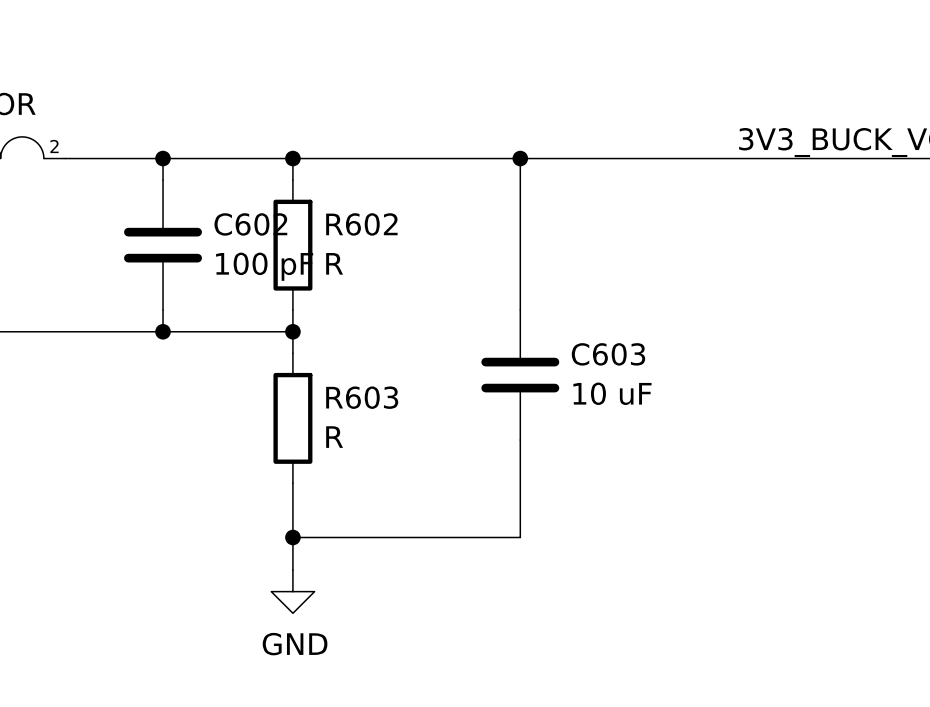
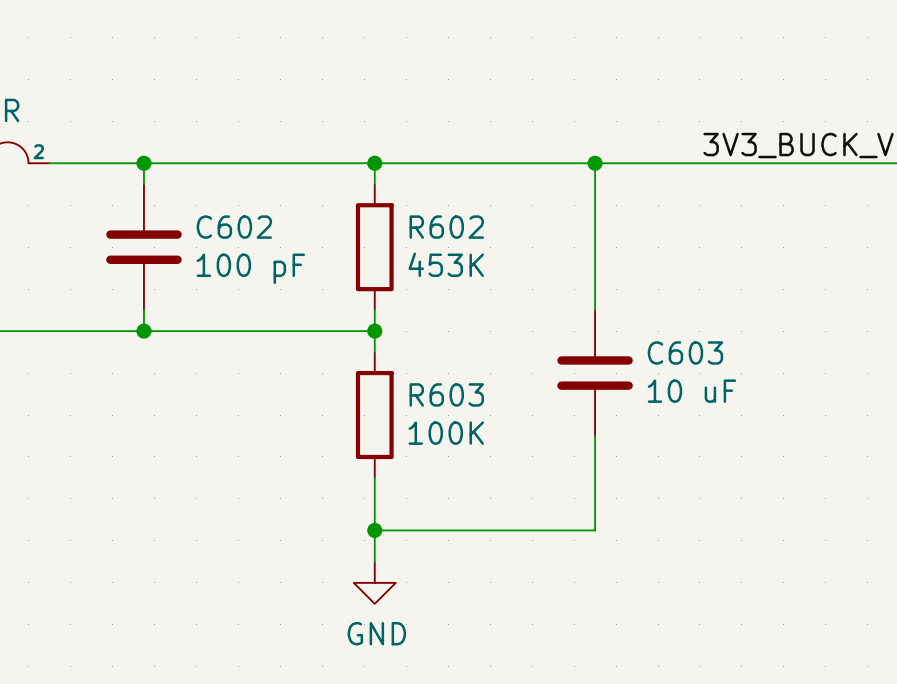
wire: (292, 158) (292, 180) -> (374, 163) (374, 184)
junction: (292, 158) -> none
junction: none -> (374, 163)
wire: (520, 158) (520, 310) -> (595, 163) (595, 310)
junction: (520, 158) -> none
junction: none -> (595, 163)
R602 position: (292, 245) -> (374, 247)
R602 value: R (334, 263) -> 453K (446, 264)
wire: (292, 310) (292, 353) -> (374, 310) (374, 352)
junction: (292, 331) -> none
junction: none -> (374, 331)
C603 position: (520, 375) -> (595, 373)
R603 position: (292, 418) -> (374, 415)
R603 value: R (334, 437) -> 100K (446, 433)
wire: (520, 440) (520, 537) -> (595, 436) (595, 530) (490, 530)
wire: (292, 483) (292, 569) -> (374, 477) (374, 561)
wire: (292, 537) (401, 537) -> (269, 331) (374, 331)
junction: (292, 537) -> none
junction: none -> (374, 530)
power symbol position: GND (292, 591) -> GND (374, 582)

